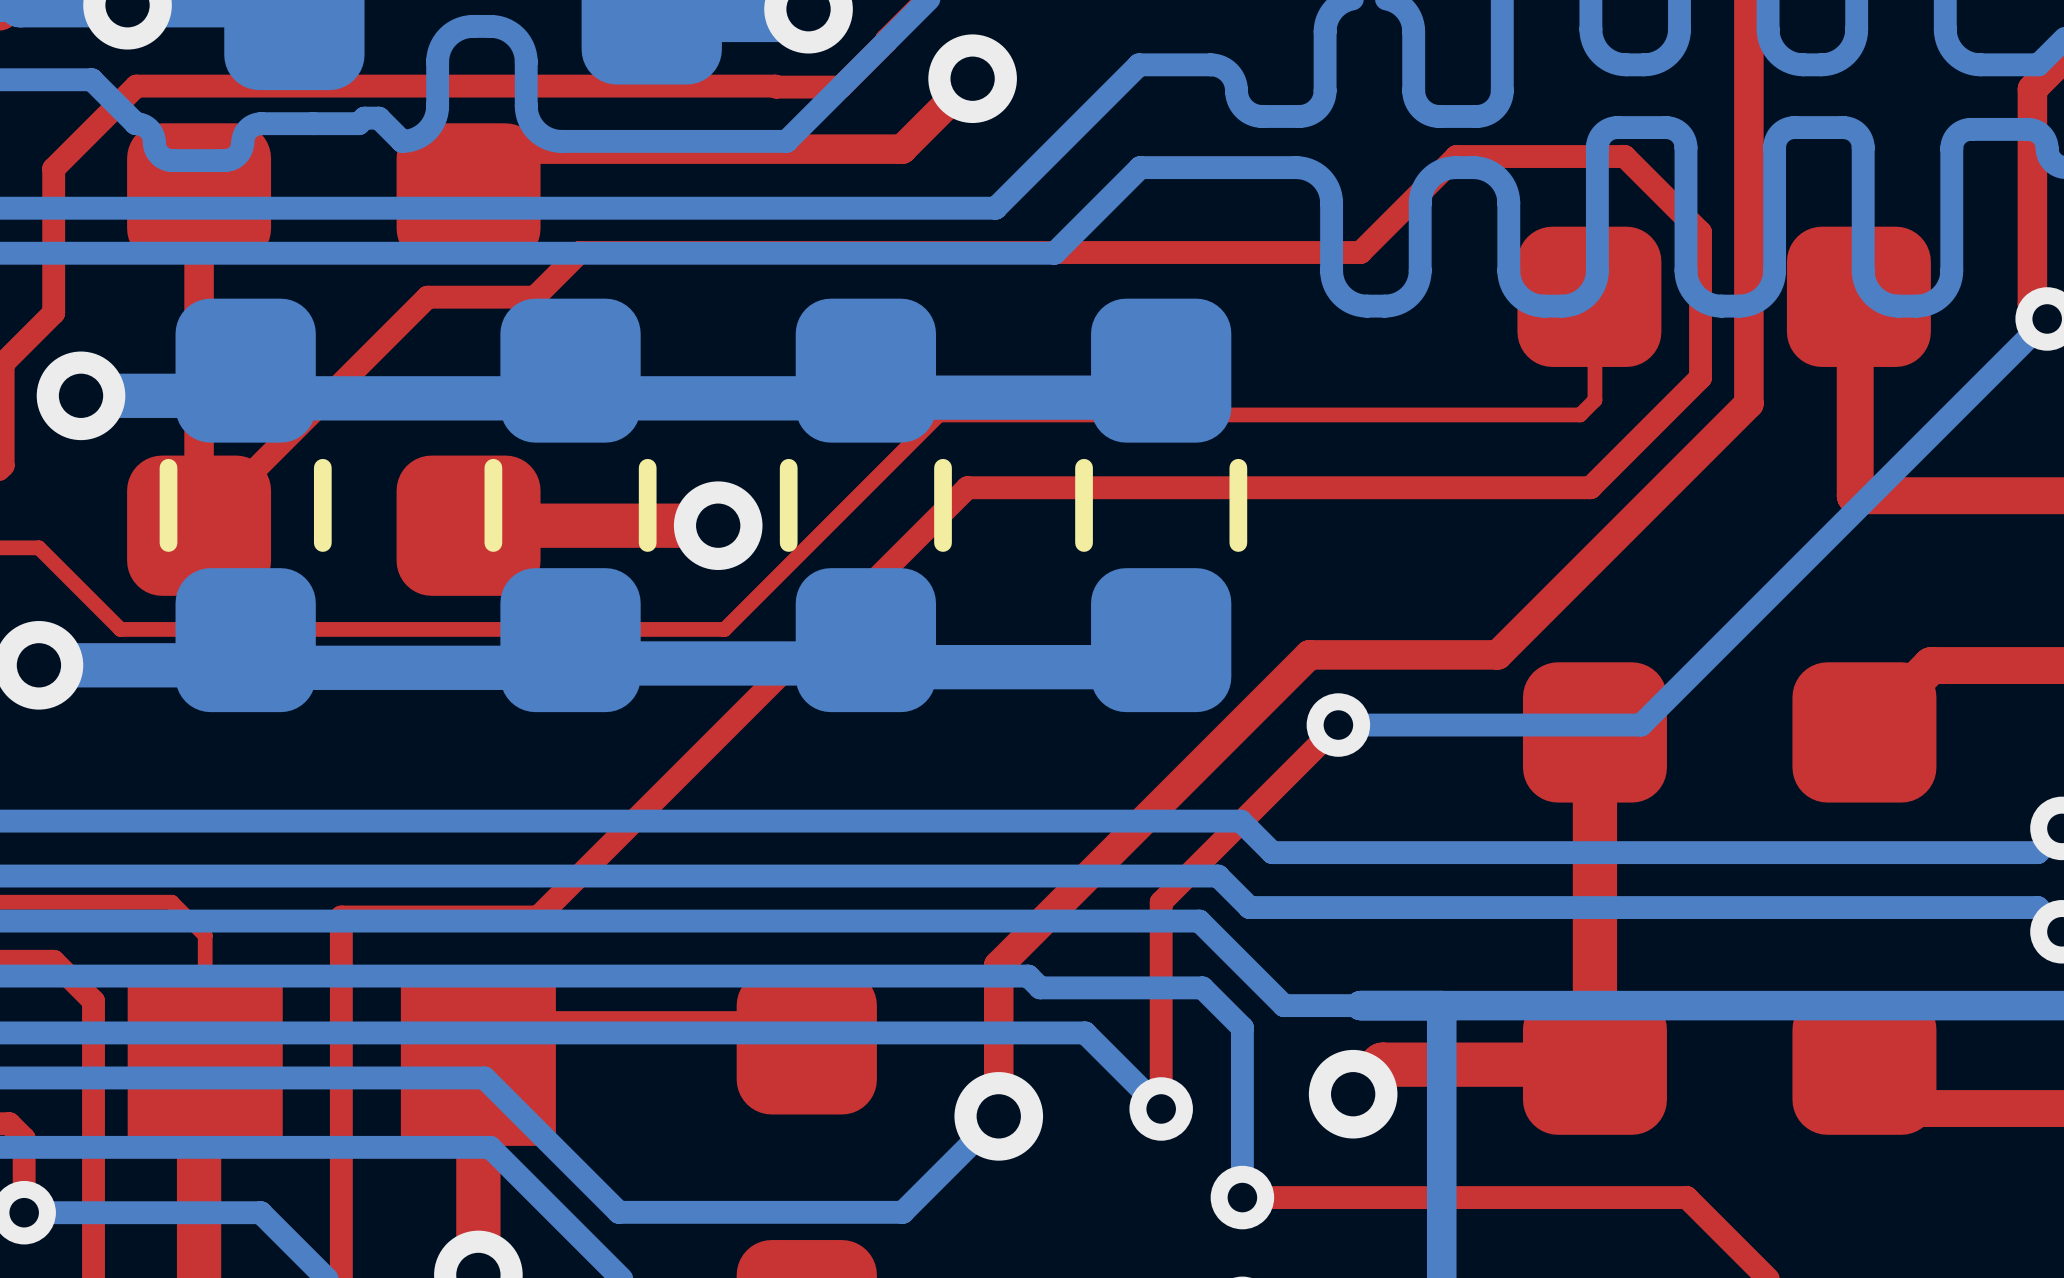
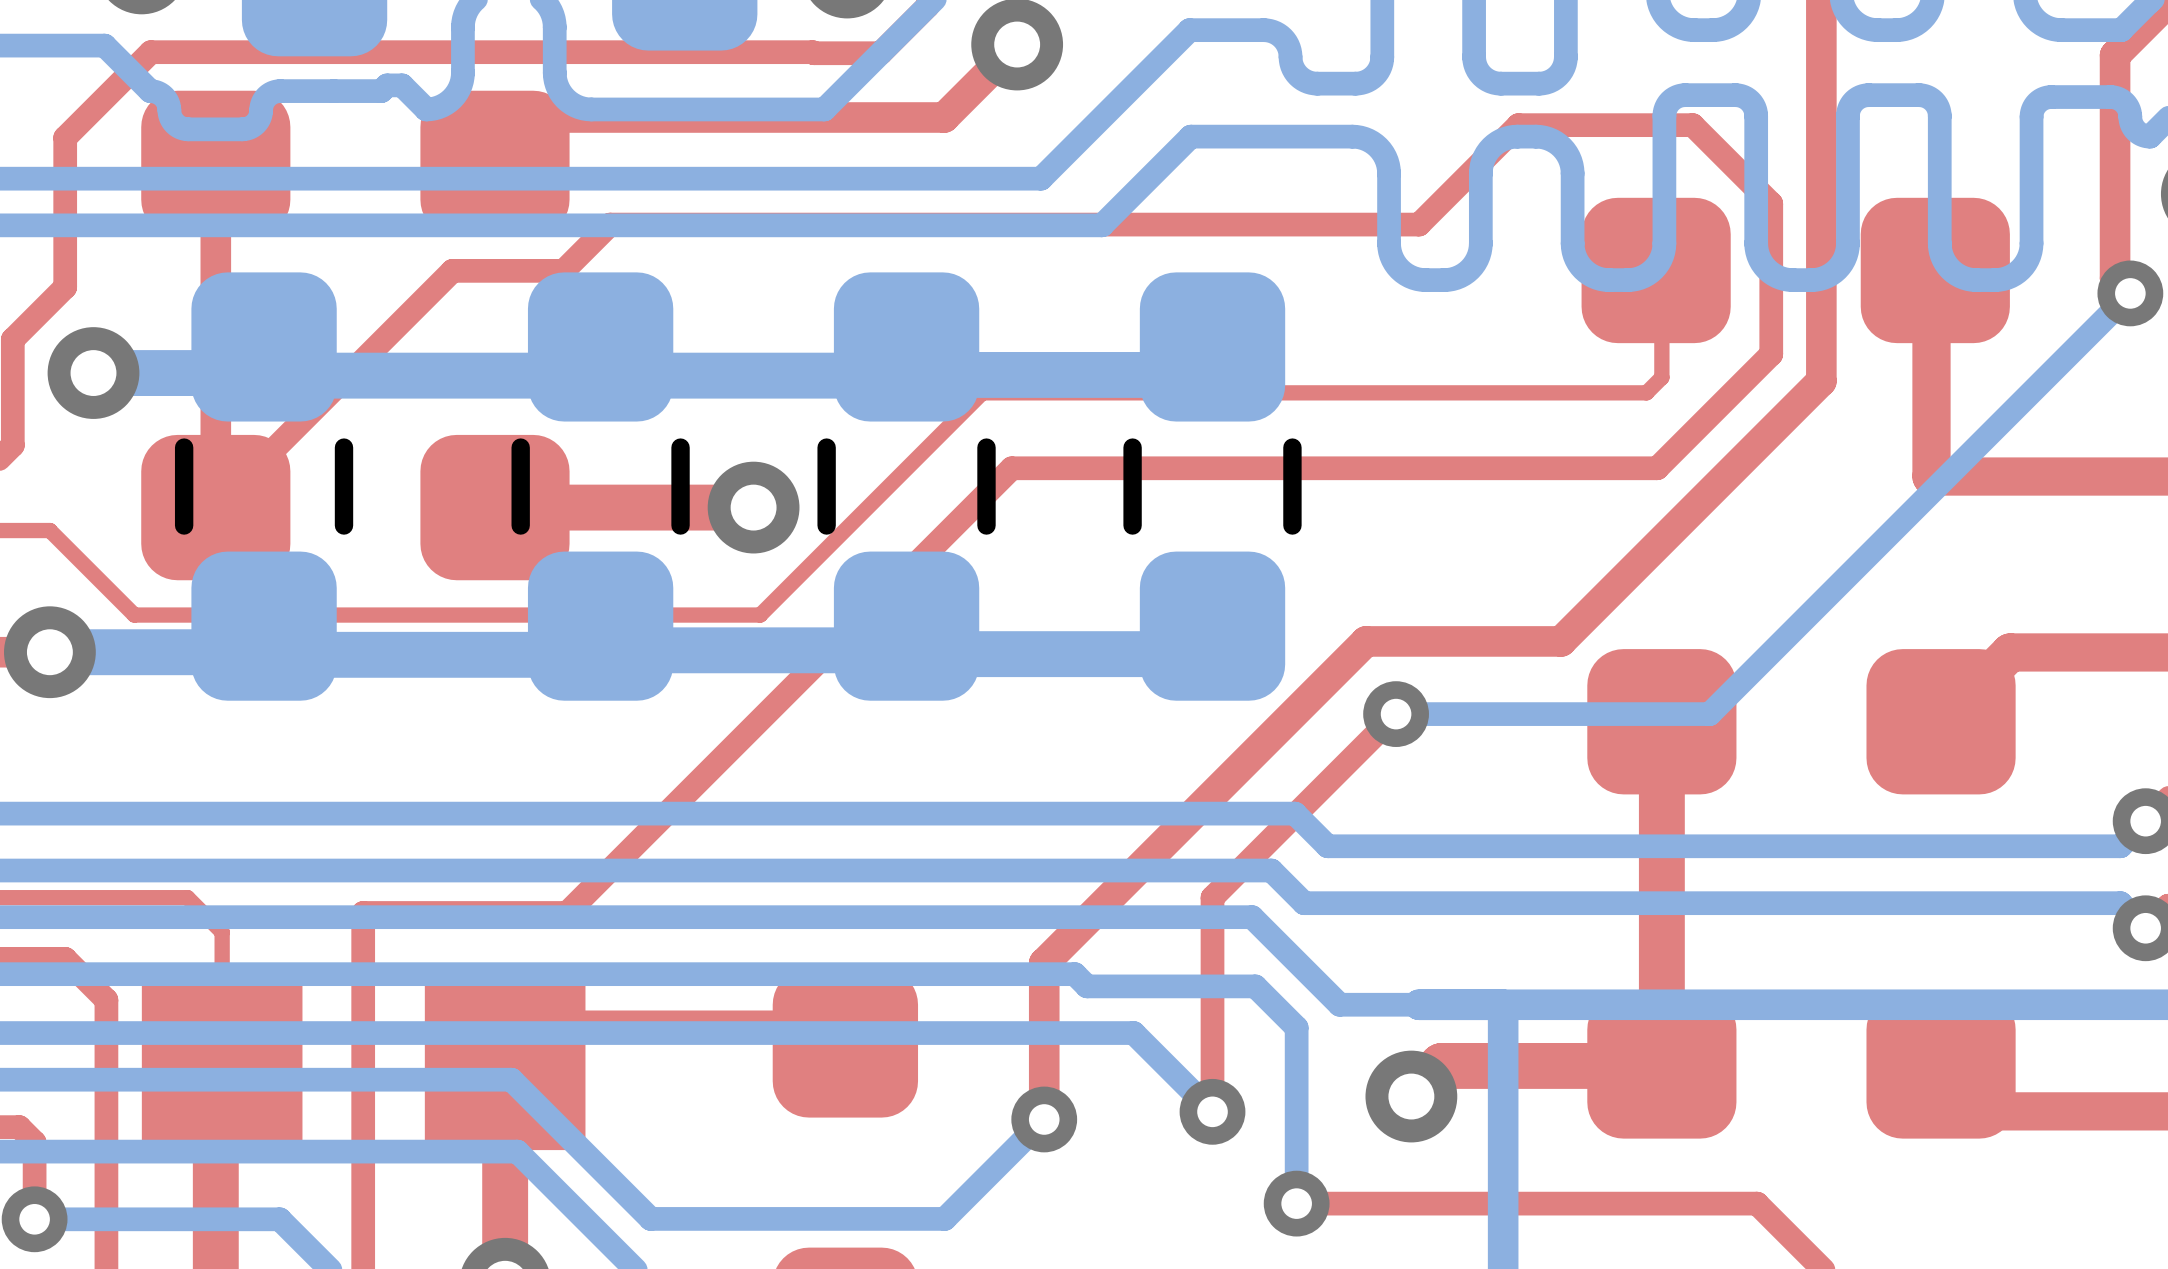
via size: [954, 1072, 1044, 1161] -> [1011, 1086, 1078, 1153]

